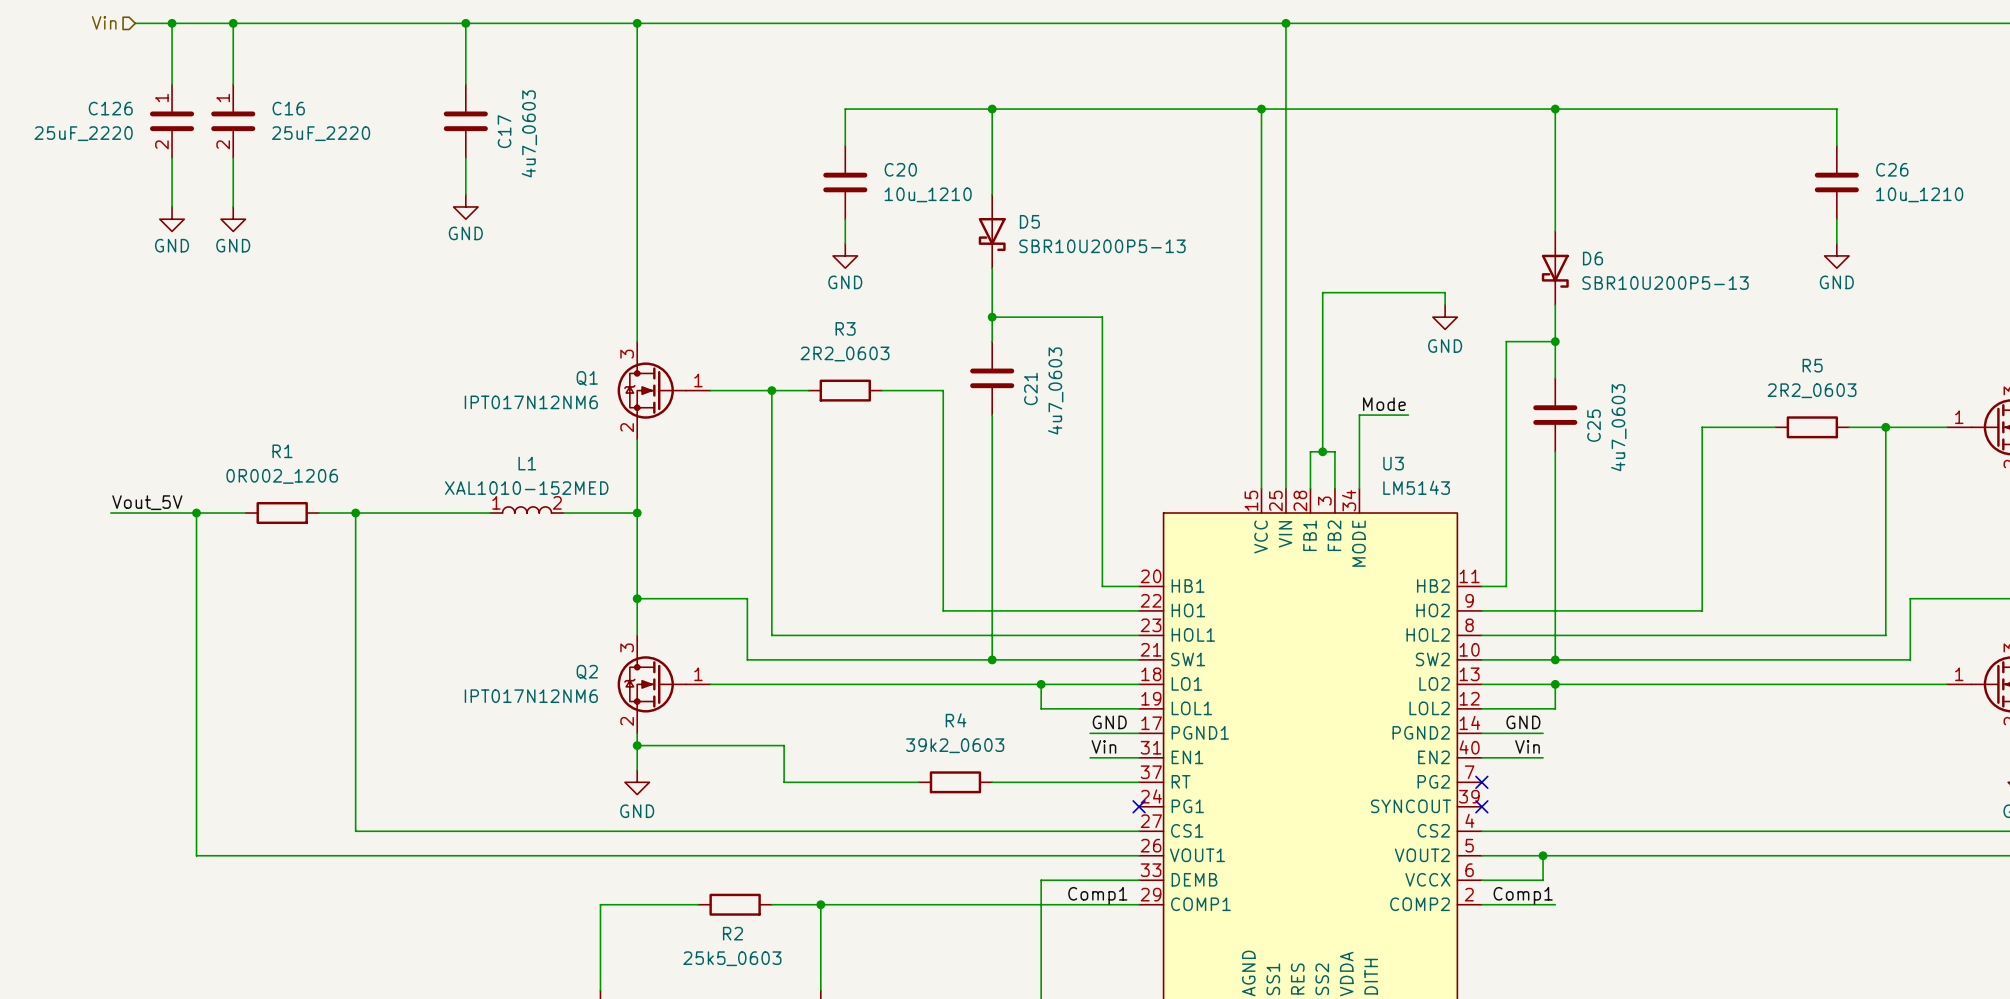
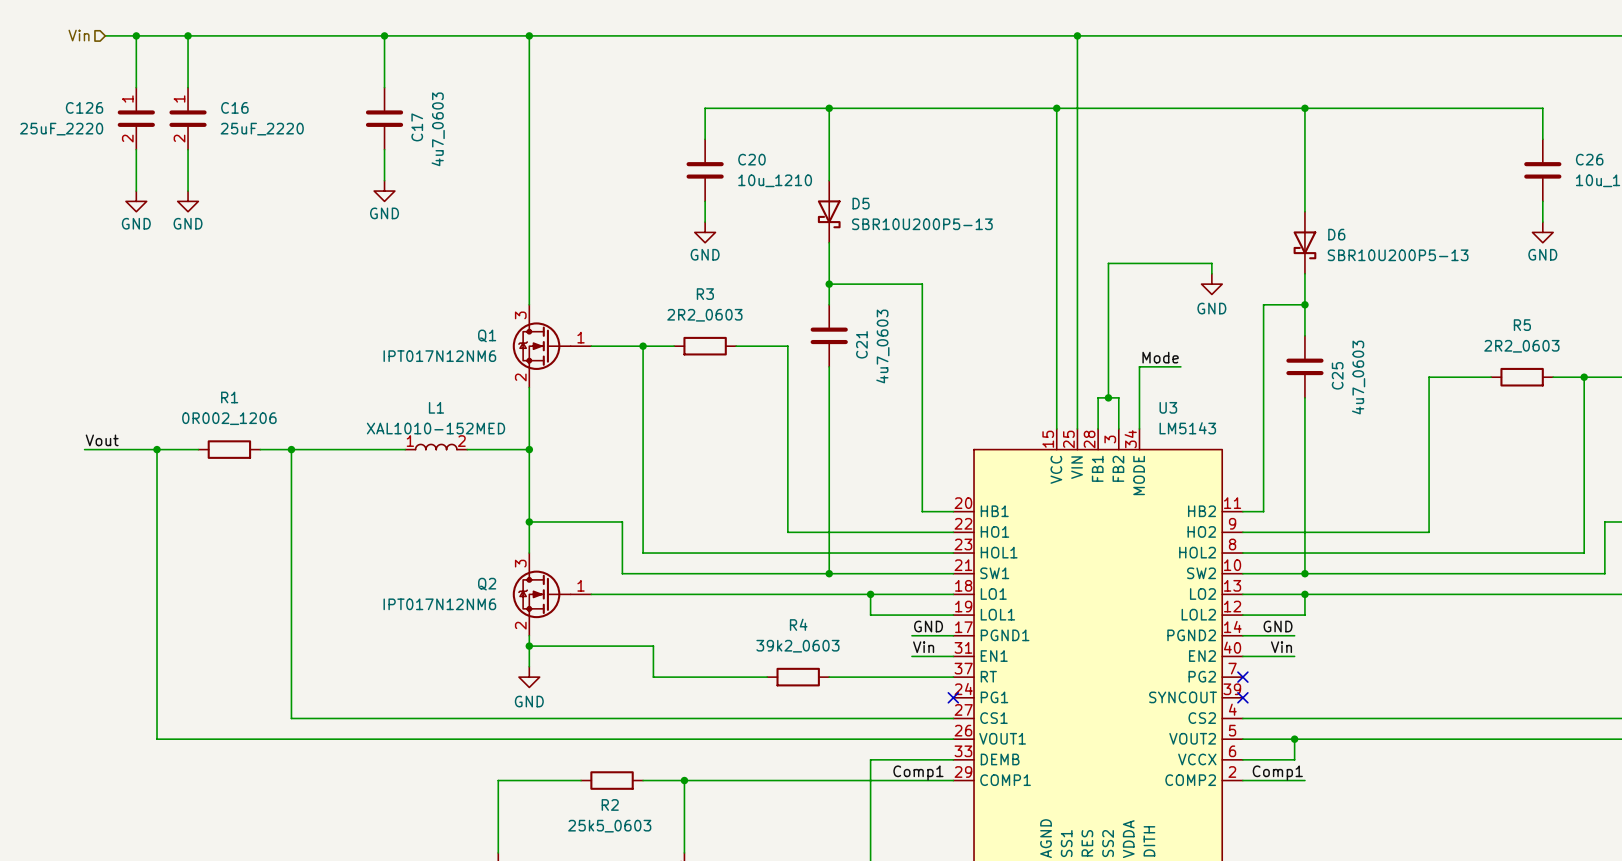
label: Vout_5V (147, 502) -> Vout (102, 440)

